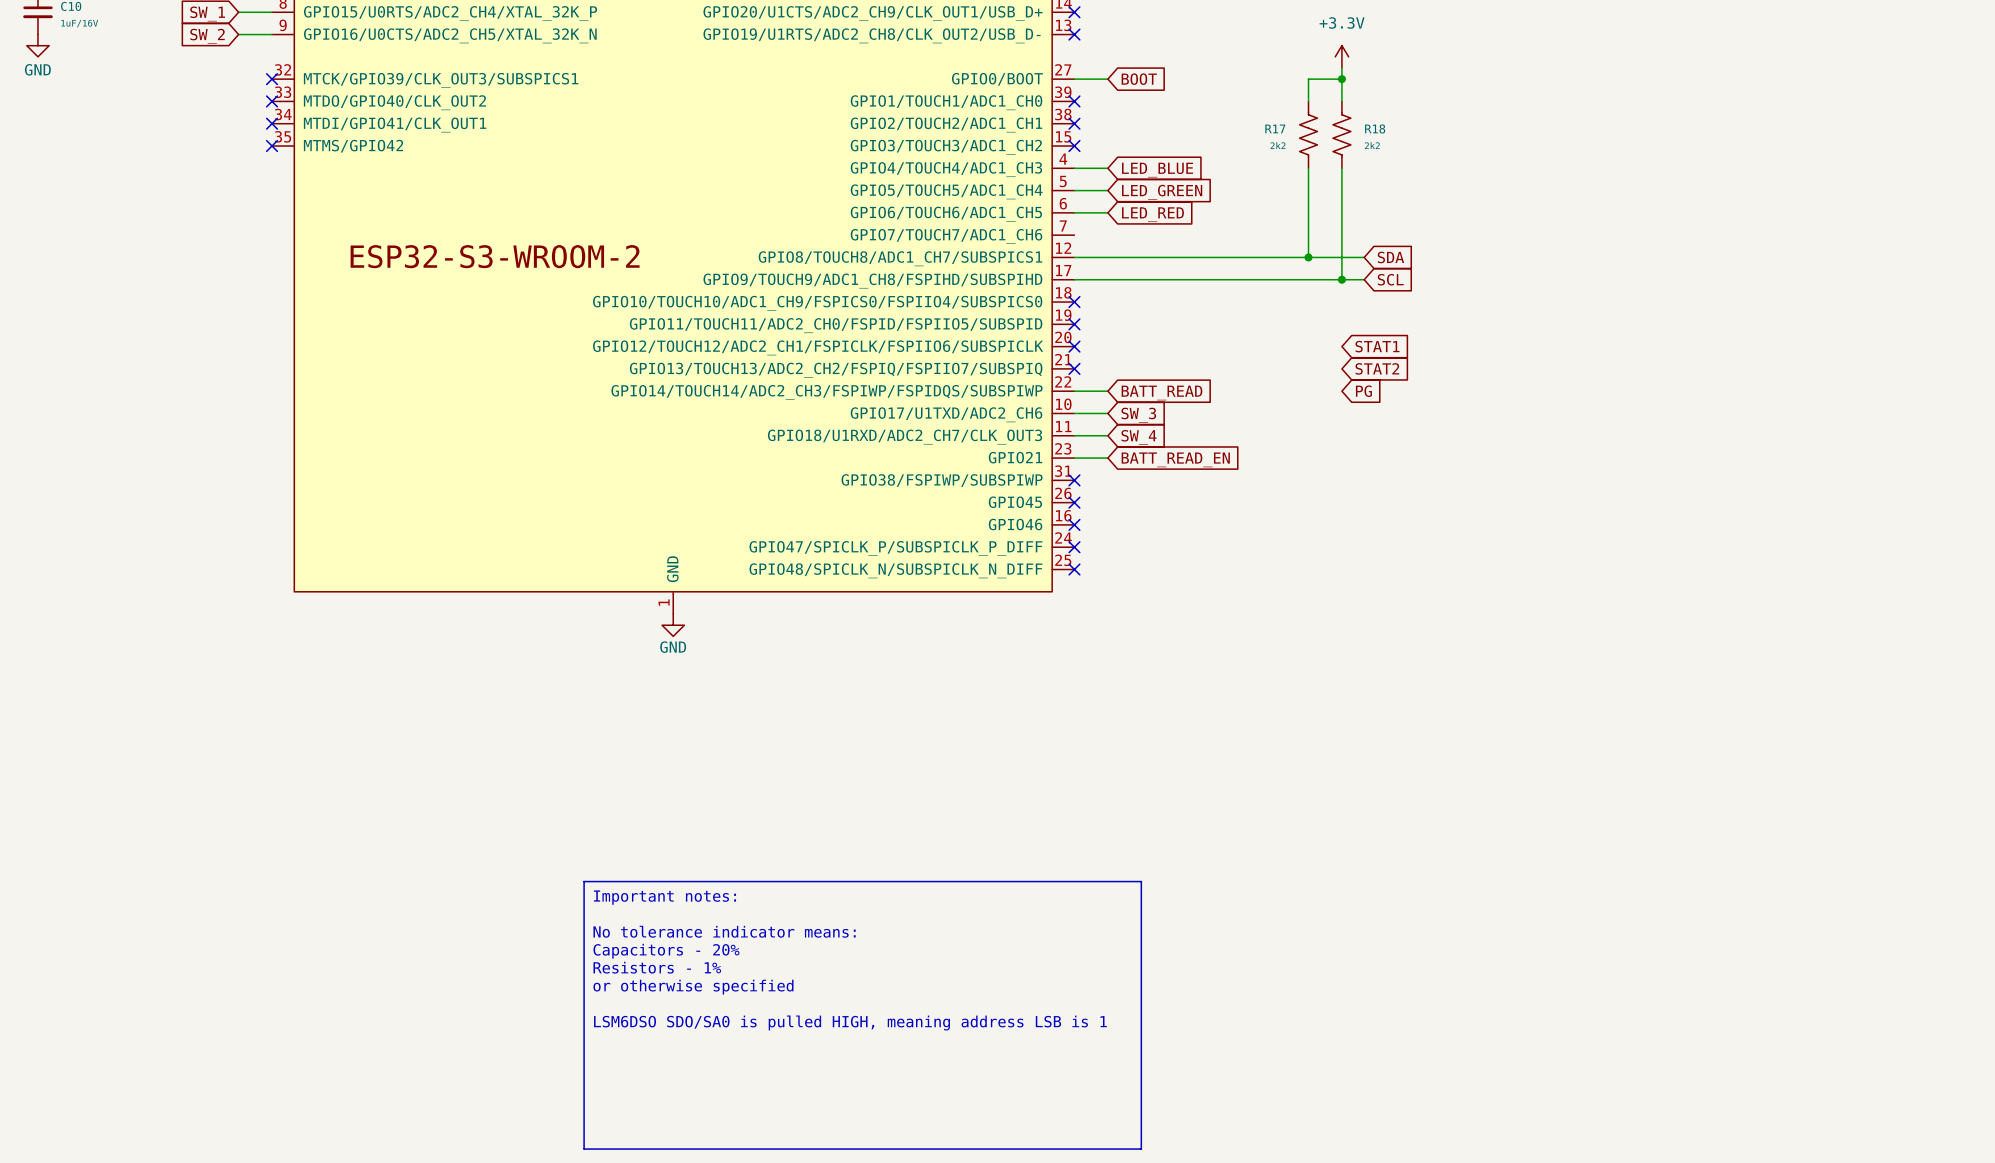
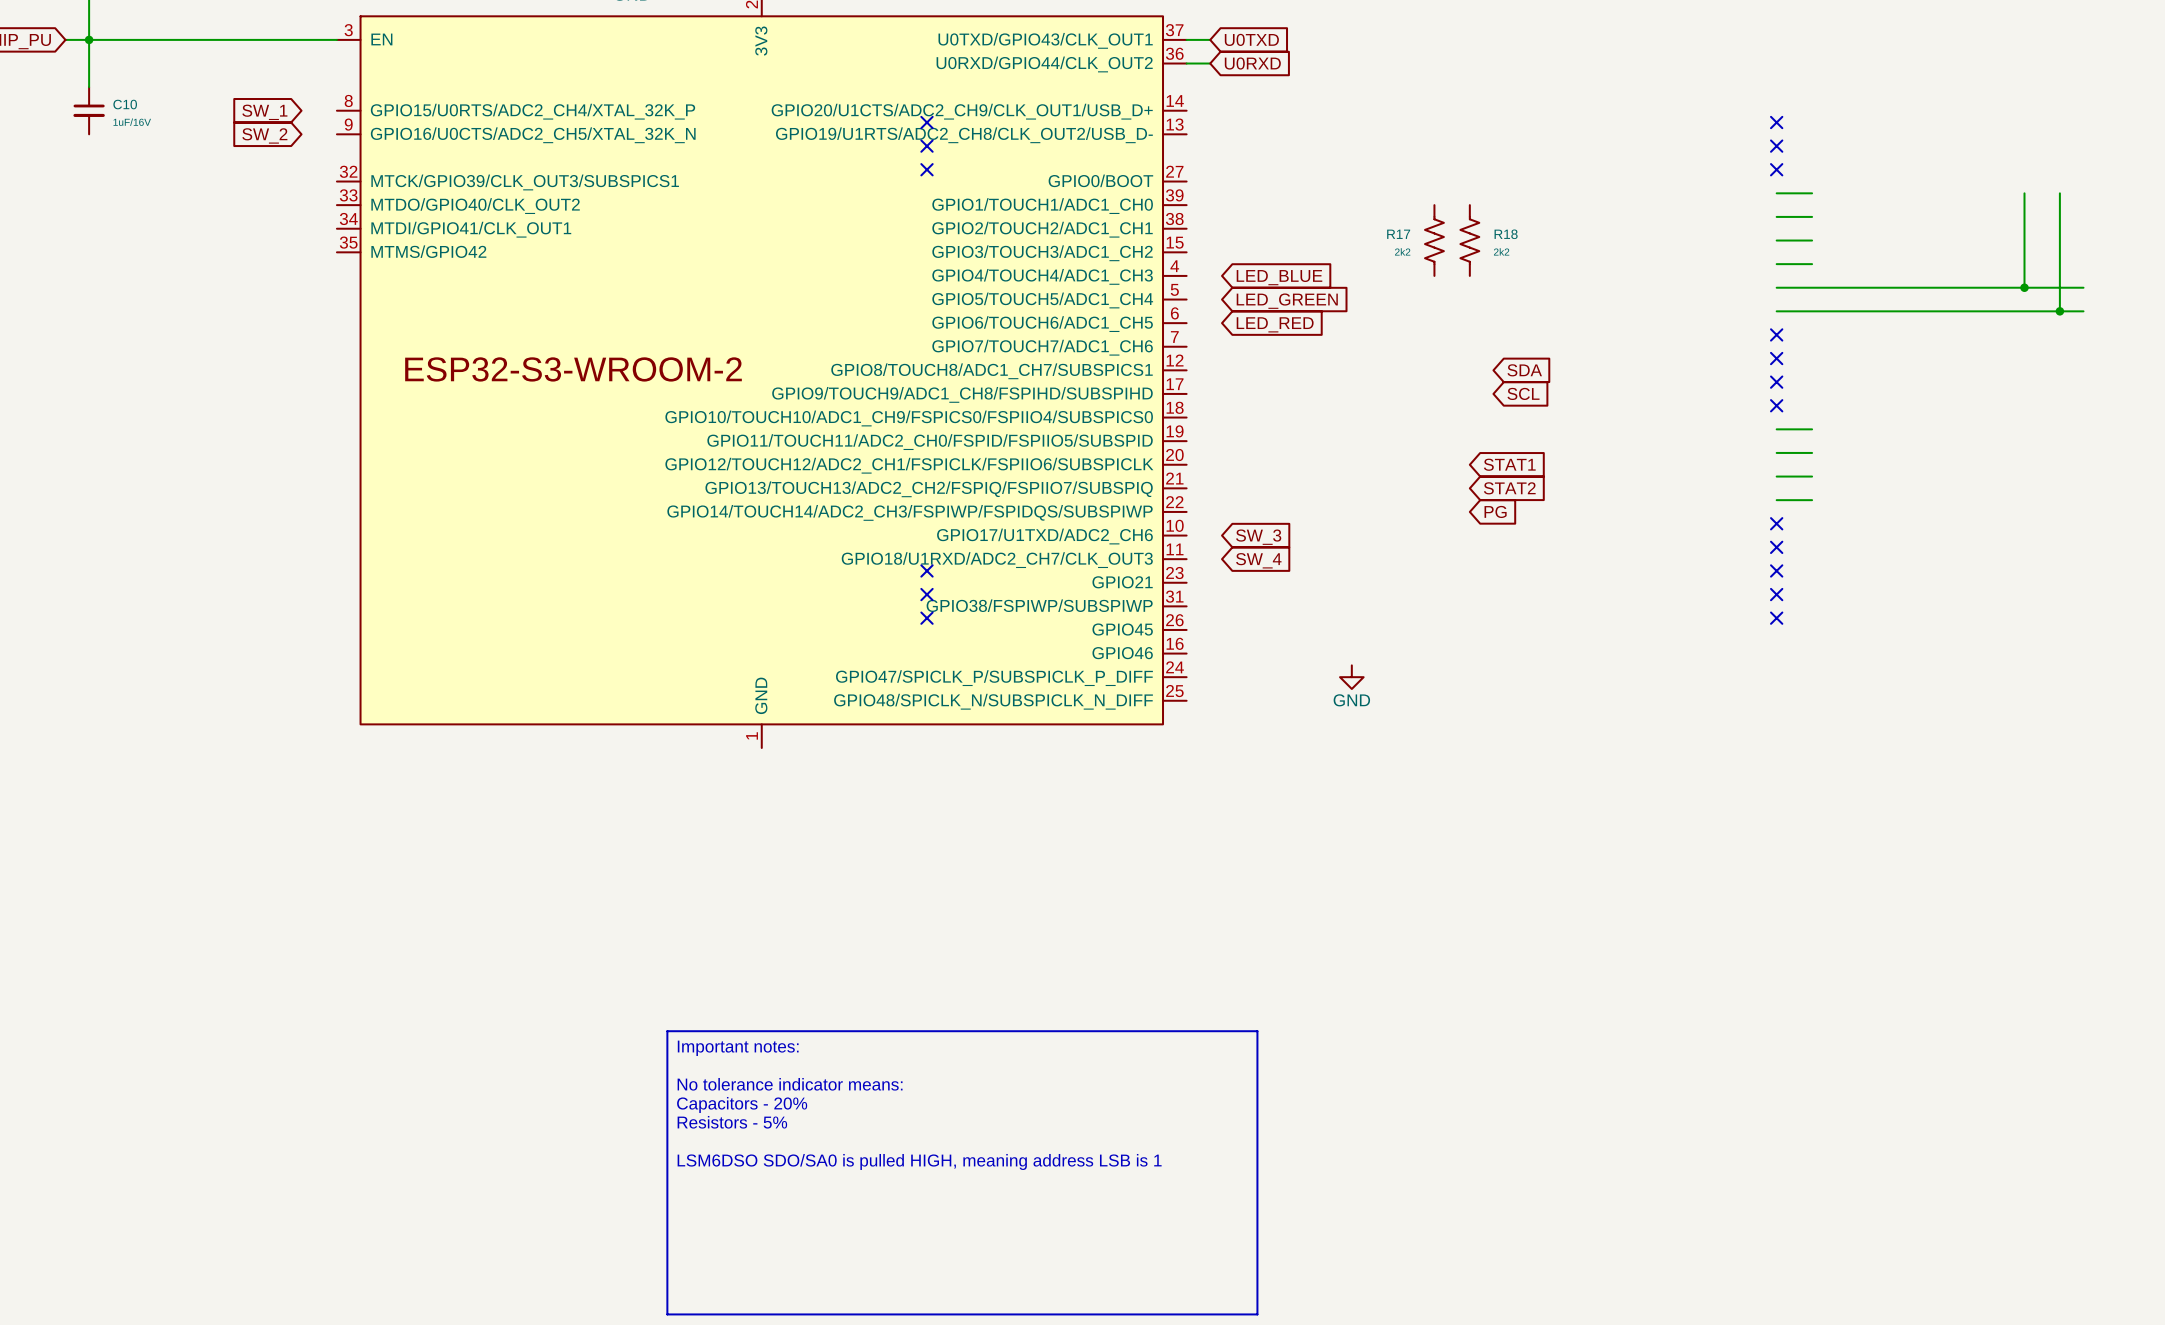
wire: (238, 12) (272, 12) -> none
no-connect mark: (1074, 12) -> none
no-connect mark: none -> (926, 122)
no-connect mark: none -> (1776, 122)
wire: (238, 34) (272, 34) -> none
no-connect mark: (1074, 34) -> none
power symbol: GND (37, 45) -> none
no-connect mark: none -> (926, 146)
no-connect mark: none -> (1776, 146)
power symbol: +3.3V (1341, 56) -> none
no-connect mark: none -> (926, 169)
wire: (1341, 67) (1341, 101) -> none
no-connect mark: none -> (1776, 169)
no-connect mark: (272, 79) -> none
wire: (1074, 79) (1107, 79) -> none
global label: BOOT (1139, 79) -> none
wire: (1341, 79) (1308, 79) (1308, 101) -> none
junction: (1341, 79) -> none
wire: none -> (1776, 193) (1812, 193)
wire: none -> (2024, 193) (2024, 287)
wire: none -> (2059, 193) (2059, 311)
no-connect mark: (272, 101) -> none
no-connect mark: (1074, 101) -> none
wire: none -> (1776, 216) (1812, 216)
no-connect mark: (272, 123) -> none
no-connect mark: (1074, 123) -> none
wire: none -> (1776, 240) (1812, 240)
no-connect mark: (272, 146) -> none
no-connect mark: (1074, 146) -> none
wire: none -> (1776, 264) (1812, 264)
wire: (1074, 168) (1107, 168) -> none
wire: (1308, 168) (1308, 257) -> none
wire: (1341, 168) (1341, 279) -> none
wire: none -> (1776, 287) (2083, 287)
junction: none -> (2024, 287)
wire: (1074, 190) (1107, 190) -> none
wire: none -> (1776, 311) (2083, 311)
junction: none -> (2059, 311)
wire: (1074, 212) (1107, 212) -> none
no-connect mark: none -> (1776, 334)
no-connect mark: none -> (1776, 358)
wire: (1074, 257) (1364, 257) -> none
junction: (1308, 257) -> none
no-connect mark: none -> (1776, 382)
wire: (1074, 279) (1364, 279) -> none
junction: (1341, 279) -> none
no-connect mark: none -> (1776, 405)
no-connect mark: (1074, 302) -> none
wire: none -> (1776, 429) (1812, 429)
no-connect mark: (1074, 324) -> none
wire: none -> (1776, 452) (1812, 452)
no-connect mark: (1074, 346) -> none
wire: none -> (1776, 476) (1812, 476)
no-connect mark: (1074, 368) -> none
wire: none -> (1776, 500) (1812, 500)
wire: (1074, 391) (1107, 391) -> none
global label: BATT_READ (1161, 392) -> none
no-connect mark: none -> (1776, 523)
wire: (1074, 413) (1107, 413) -> none
no-connect mark: none -> (1776, 547)
wire: (1074, 435) (1107, 435) -> none
no-connect mark: none -> (926, 570)
no-connect mark: none -> (1776, 570)
wire: (1074, 458) (1107, 458) -> none
global label: BATT_READ_EN (1175, 459) -> none
no-connect mark: none -> (926, 594)
no-connect mark: none -> (1776, 594)
no-connect mark: (1074, 480) -> none
no-connect mark: none -> (926, 618)
no-connect mark: none -> (1776, 618)
no-connect mark: (1074, 502) -> none
no-connect mark: (1074, 524) -> none
no-connect mark: (1074, 547) -> none
power symbol: none -> GND (1351, 677)
no-connect mark: (1074, 569) -> none
power symbol: GND (673, 625) -> none
text: Resistors - 1% (657, 967) -> Resistors - 5% (732, 1122)
text: or otherwise specified (693, 987) -> none
text position: LSM6DSO SDO/SA0 is pulled HIGH, meaning address LSB is 1 (850, 1023) -> LSM6DSO SDO/SA0 is pulled HIGH, meaning address LSB is 1 (919, 1161)

